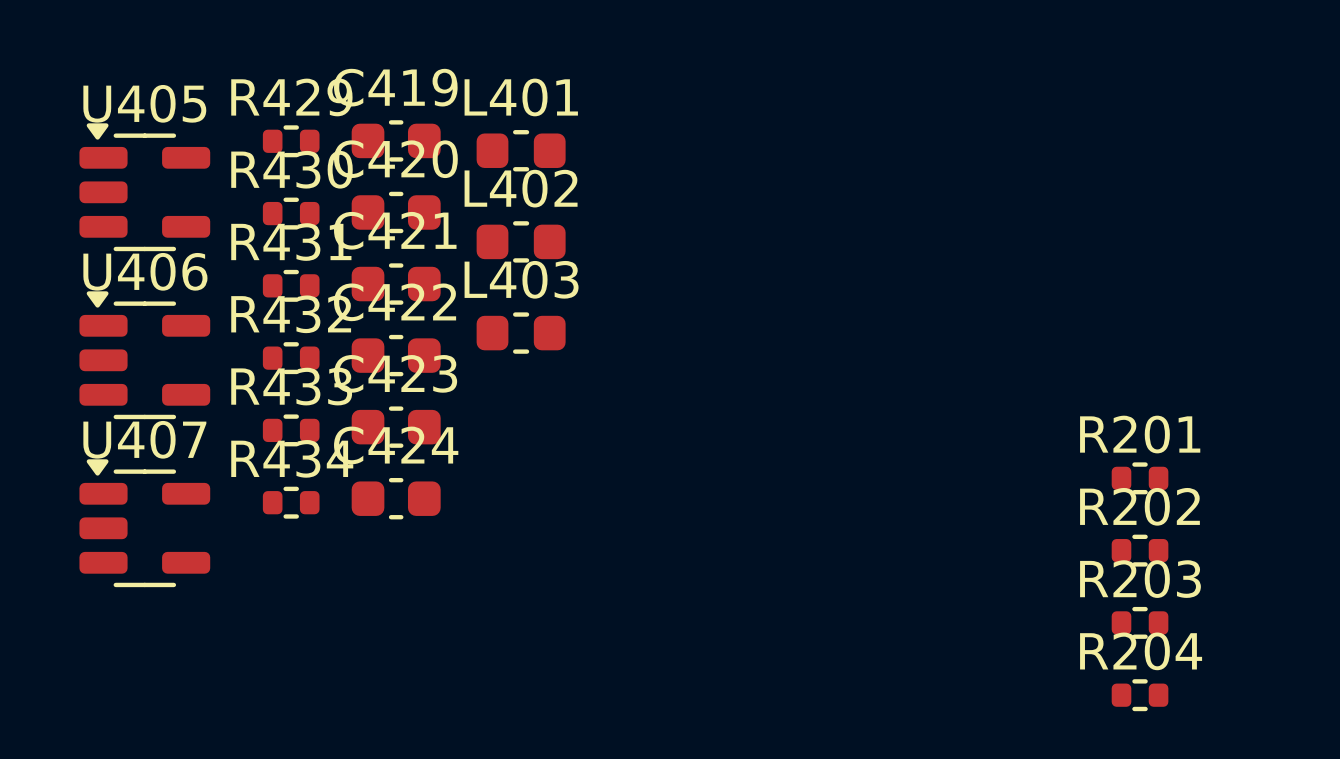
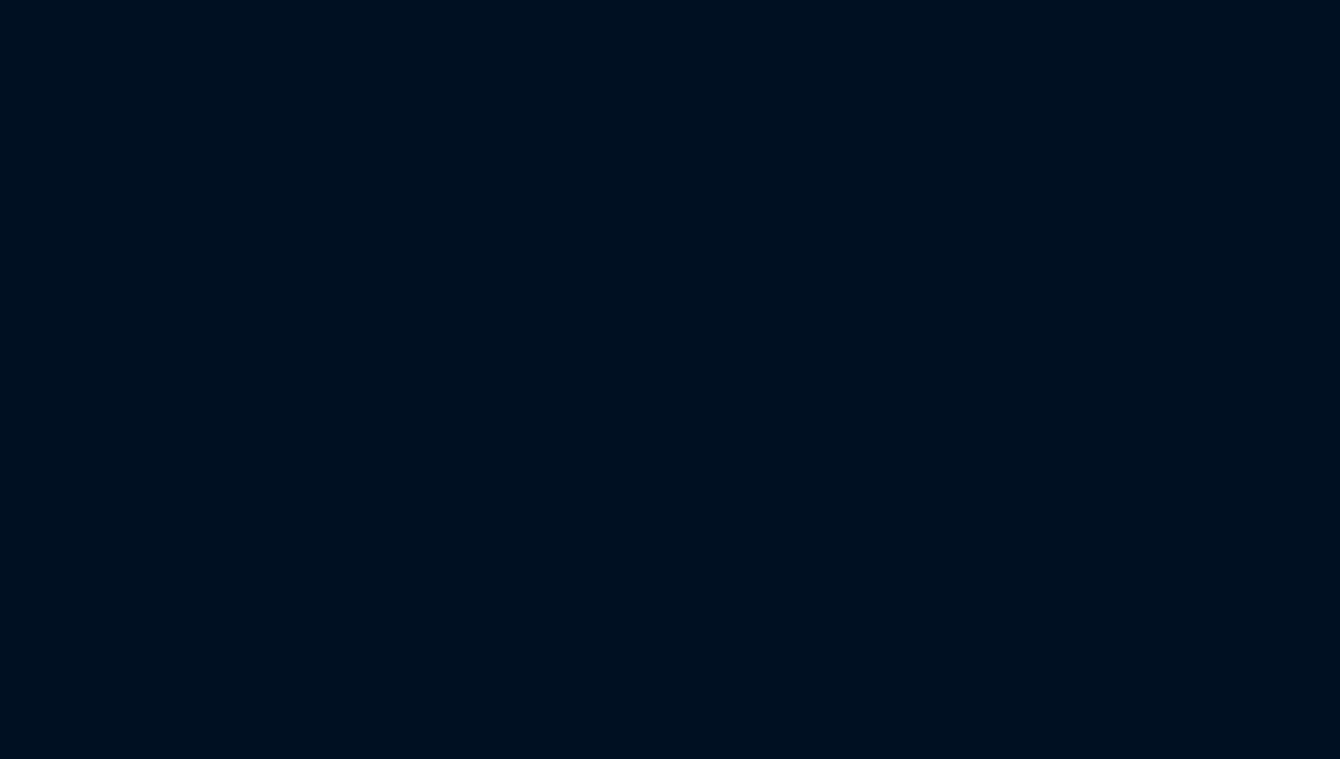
C419: (396, 140) -> none
R429: (291, 141) -> none
L401: (521, 150) -> none
U405: (144, 187) -> none
C420: (396, 212) -> none
R430: (291, 213) -> none
L402: (521, 241) -> none
C421: (396, 284) -> none
R431: (291, 285) -> none
L403: (521, 333) -> none
U406: (144, 355) -> none
C422: (396, 355) -> none
R432: (291, 358) -> none
C423: (396, 427) -> none
R433: (291, 430) -> none
R201: (1140, 478) -> none
C424: (396, 498) -> none
R434: (291, 502) -> none
U407: (144, 523) -> none
R202: (1140, 550) -> none
R203: (1140, 622) -> none
R204: (1140, 695) -> none

